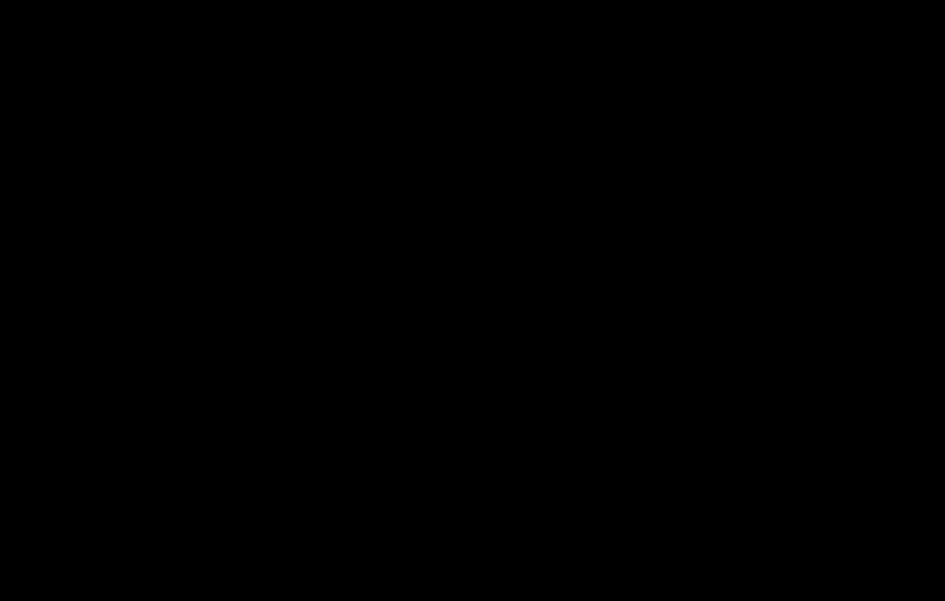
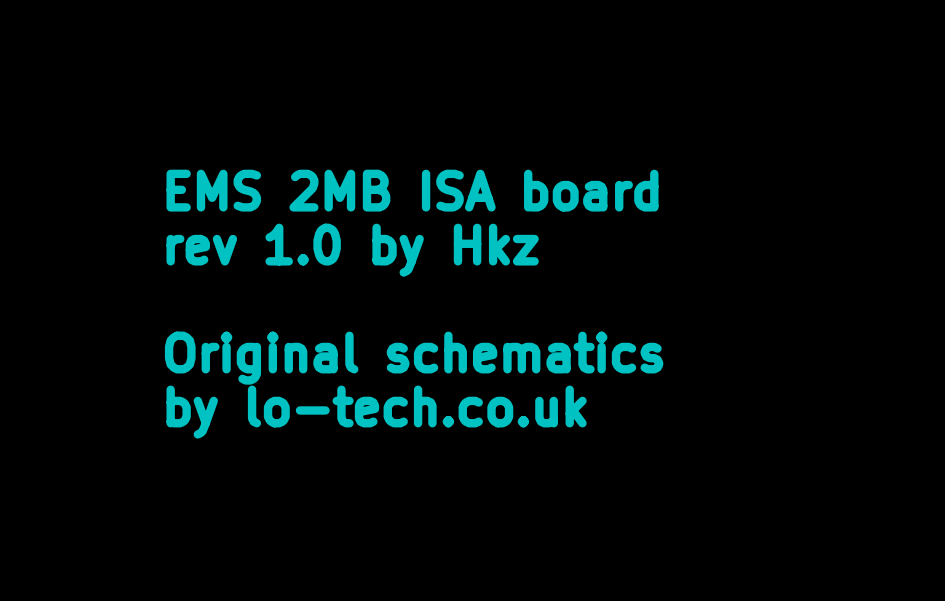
text: none -> EMS 2MB ISA board (412, 190)
text: none -> rev 1.0 by Hkz (352, 250)
text: none -> Original schematics (414, 358)
text: none -> by lo-tech.co.uk (376, 412)

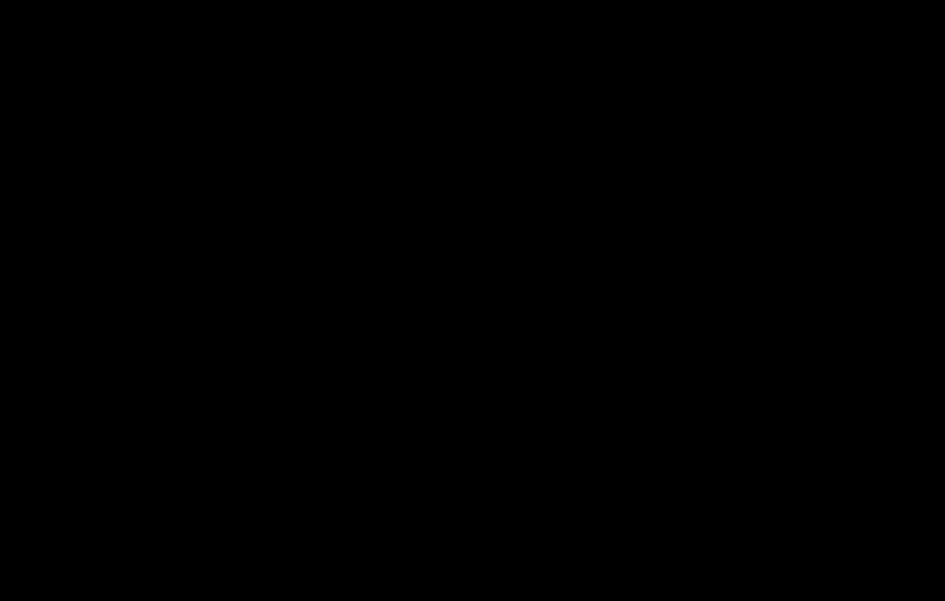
text: EMS 2MB ISA board (412, 190) -> none
text: rev 1.0 by Hkz (352, 250) -> none
text: Original schematics (414, 358) -> none
text: by lo-tech.co.uk (376, 412) -> none

